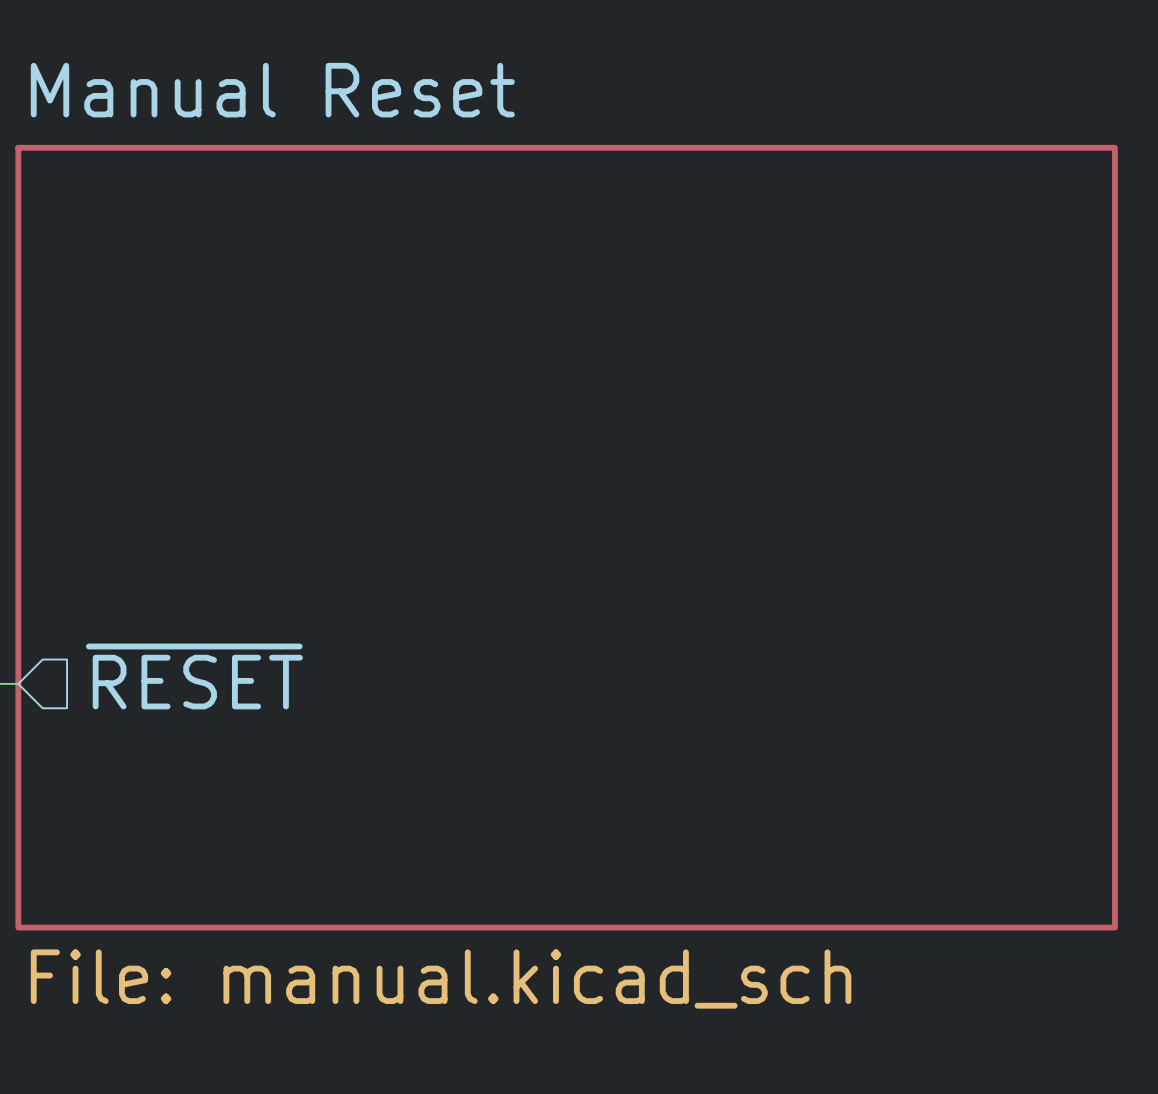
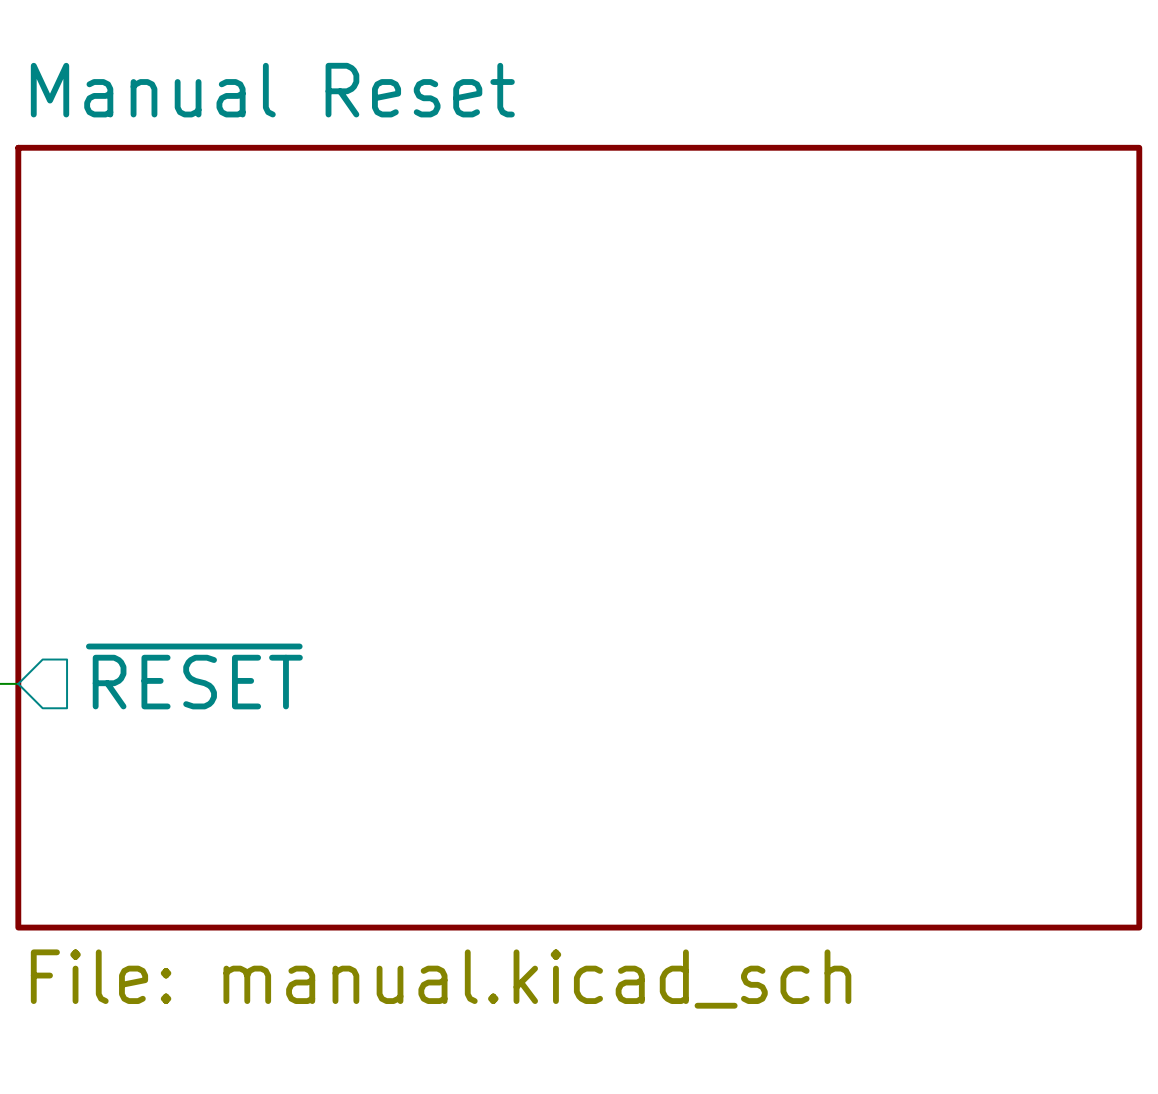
sheet Manual Reset shape: [15, 144, 1118, 931] -> [15, 144, 1143, 931]

